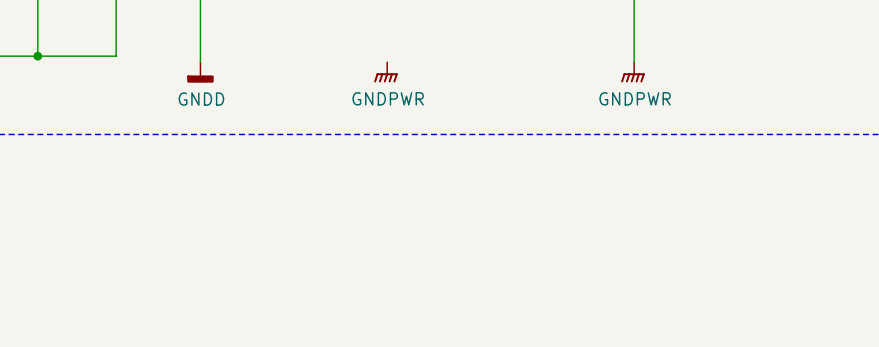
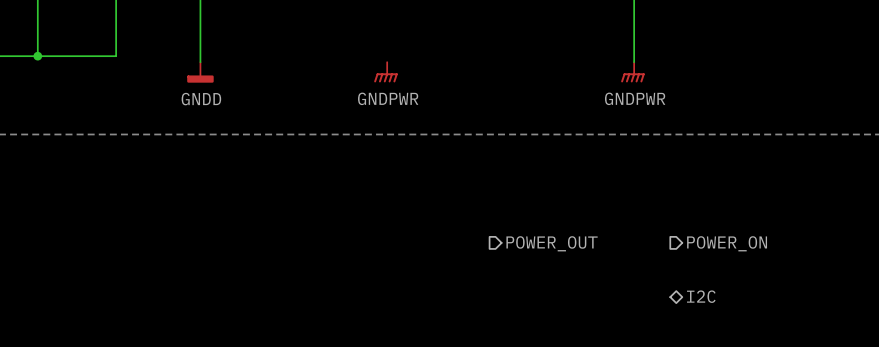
hierarchical label: none -> POWER_OUT (552, 243)
hierarchical label: none -> POWER_ON (727, 243)
hierarchical label: none -> I2C (701, 296)

